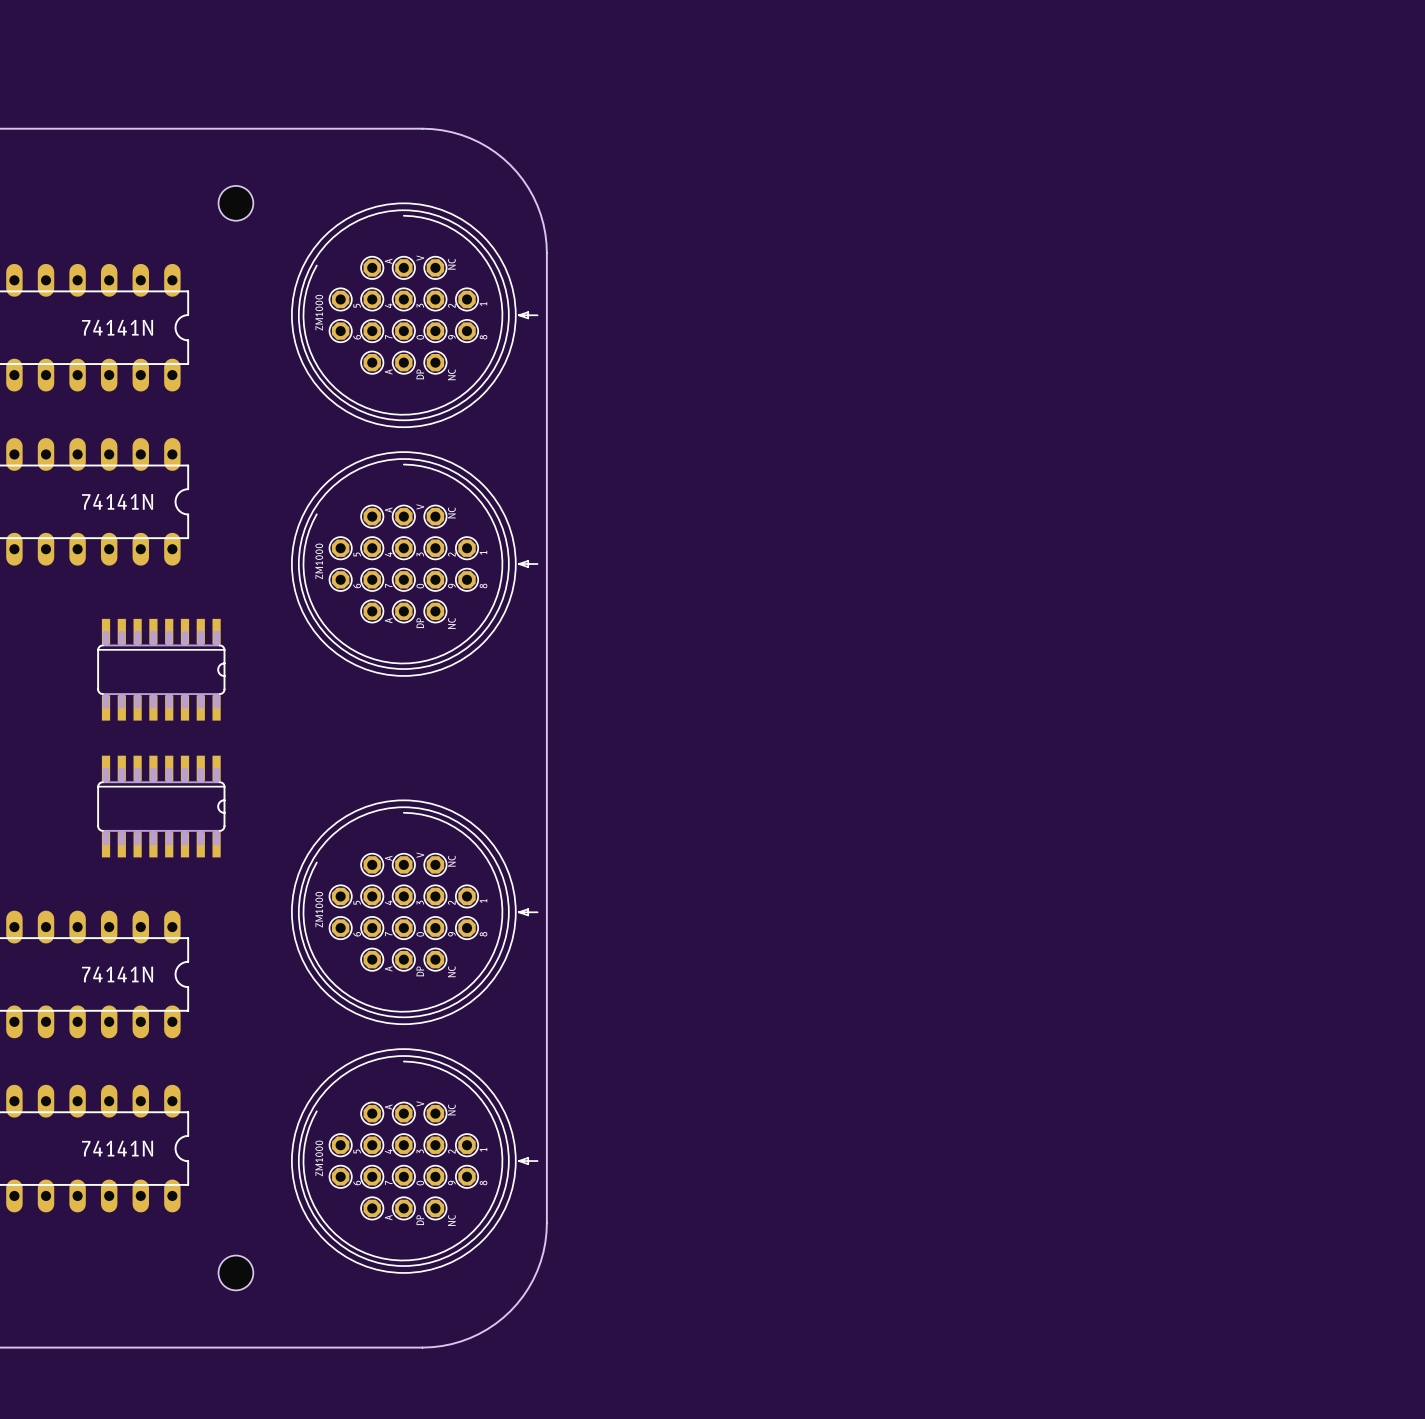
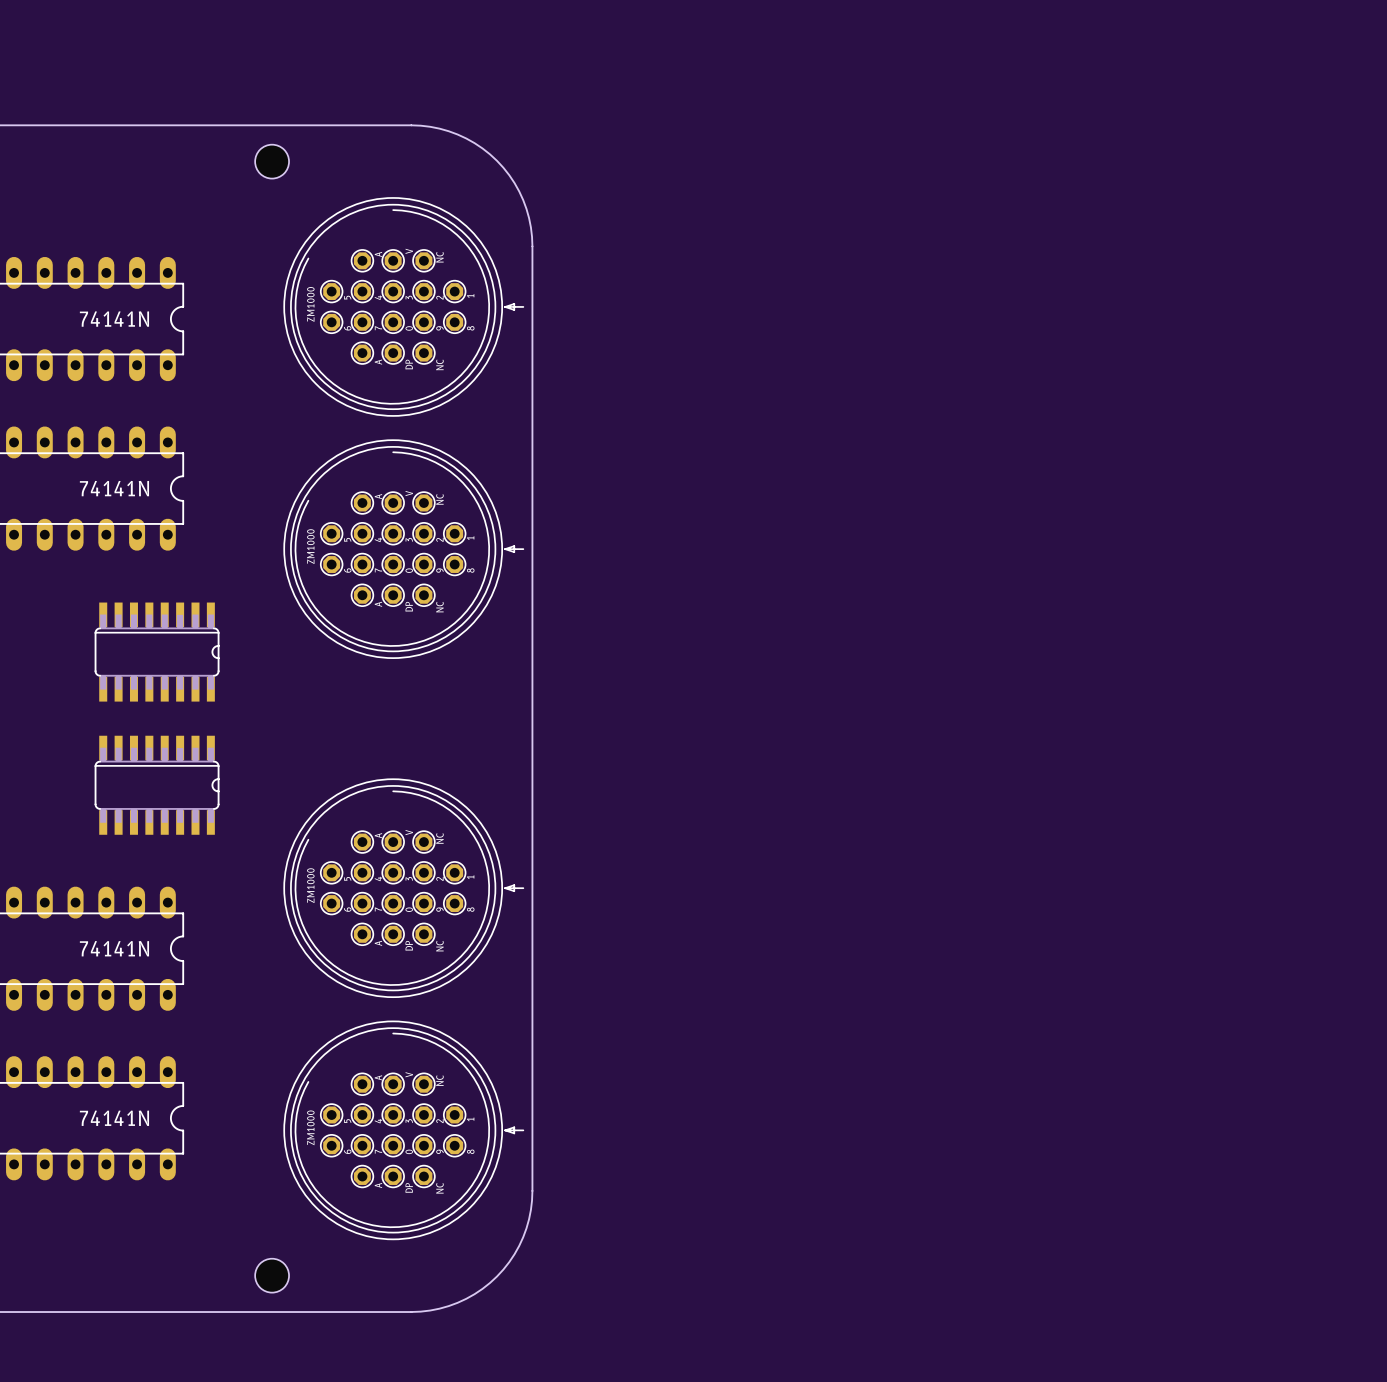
hole position: (235, 203) -> (272, 161)
hole position: (235, 1272) -> (272, 1275)

